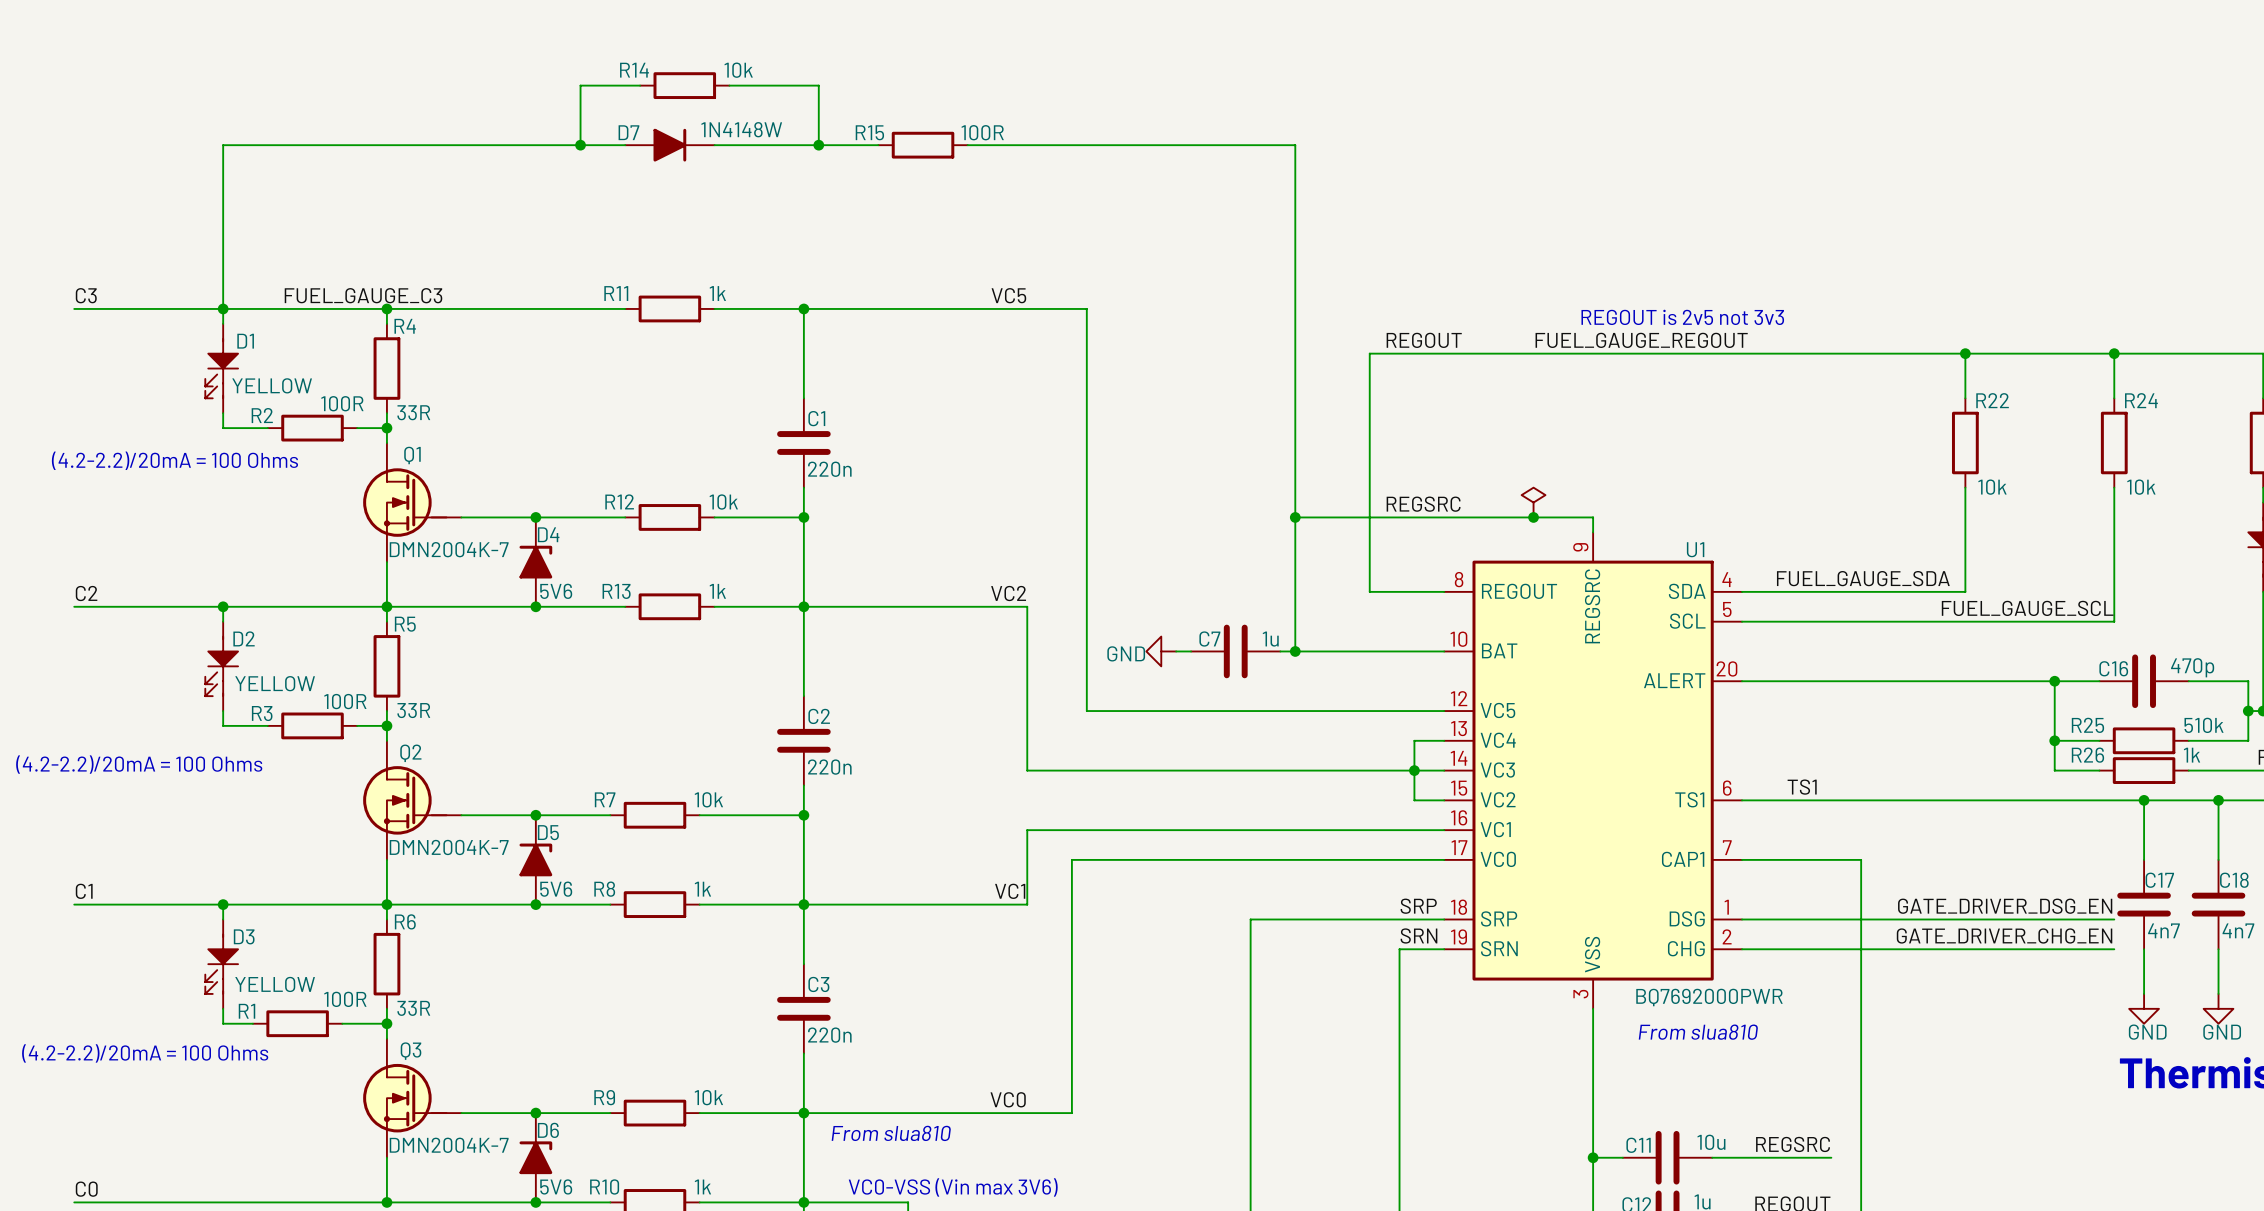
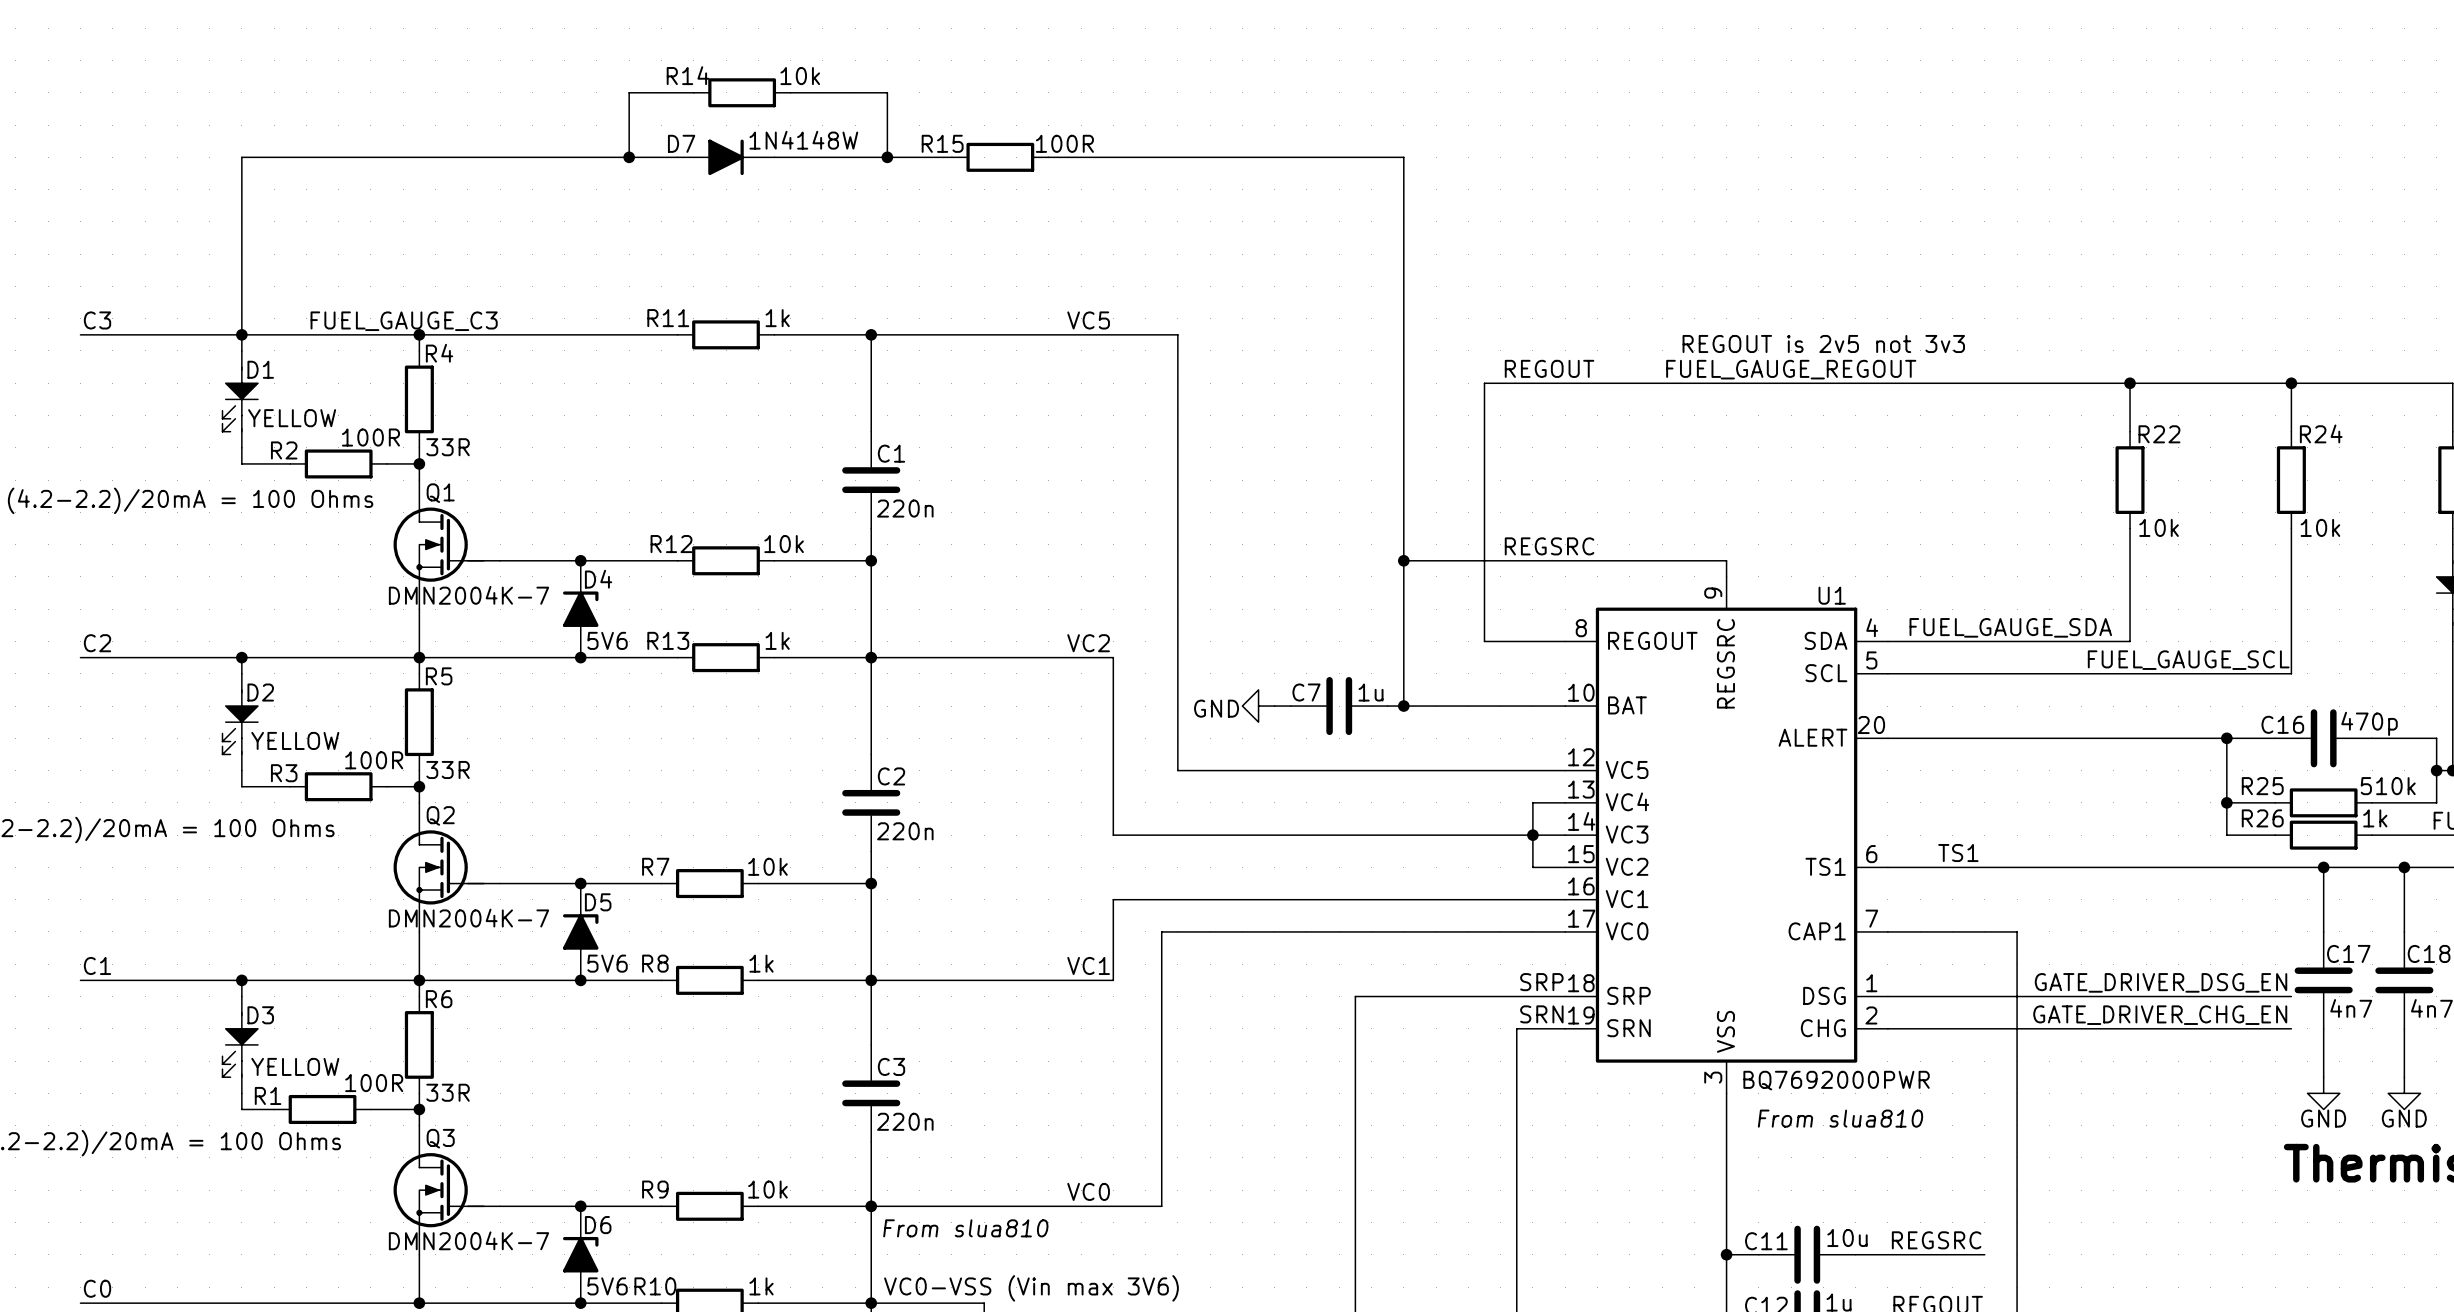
power symbol: (1533, 502) -> none
junction: (1533, 517) -> none

